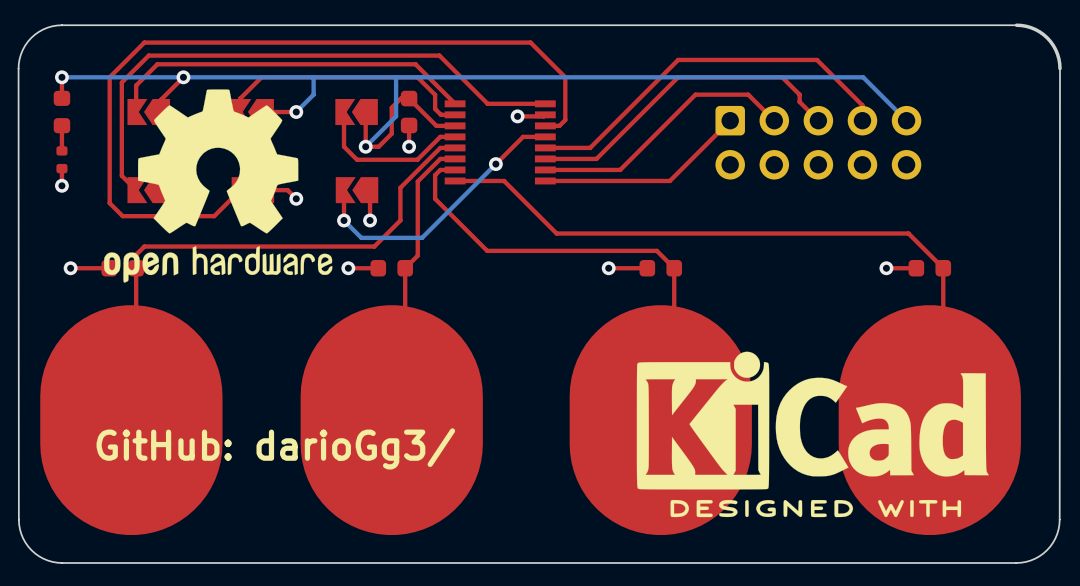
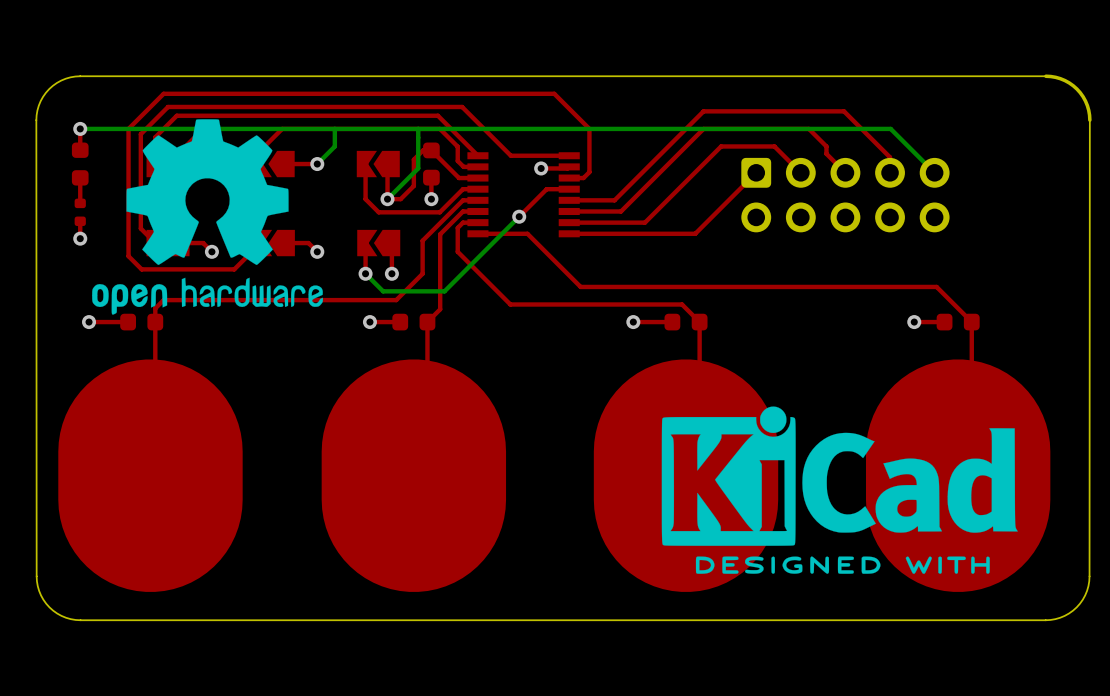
drawing position: (218, 186) -> (207, 216)
text: GitHub: darioGg3/ (275, 448) -> none

